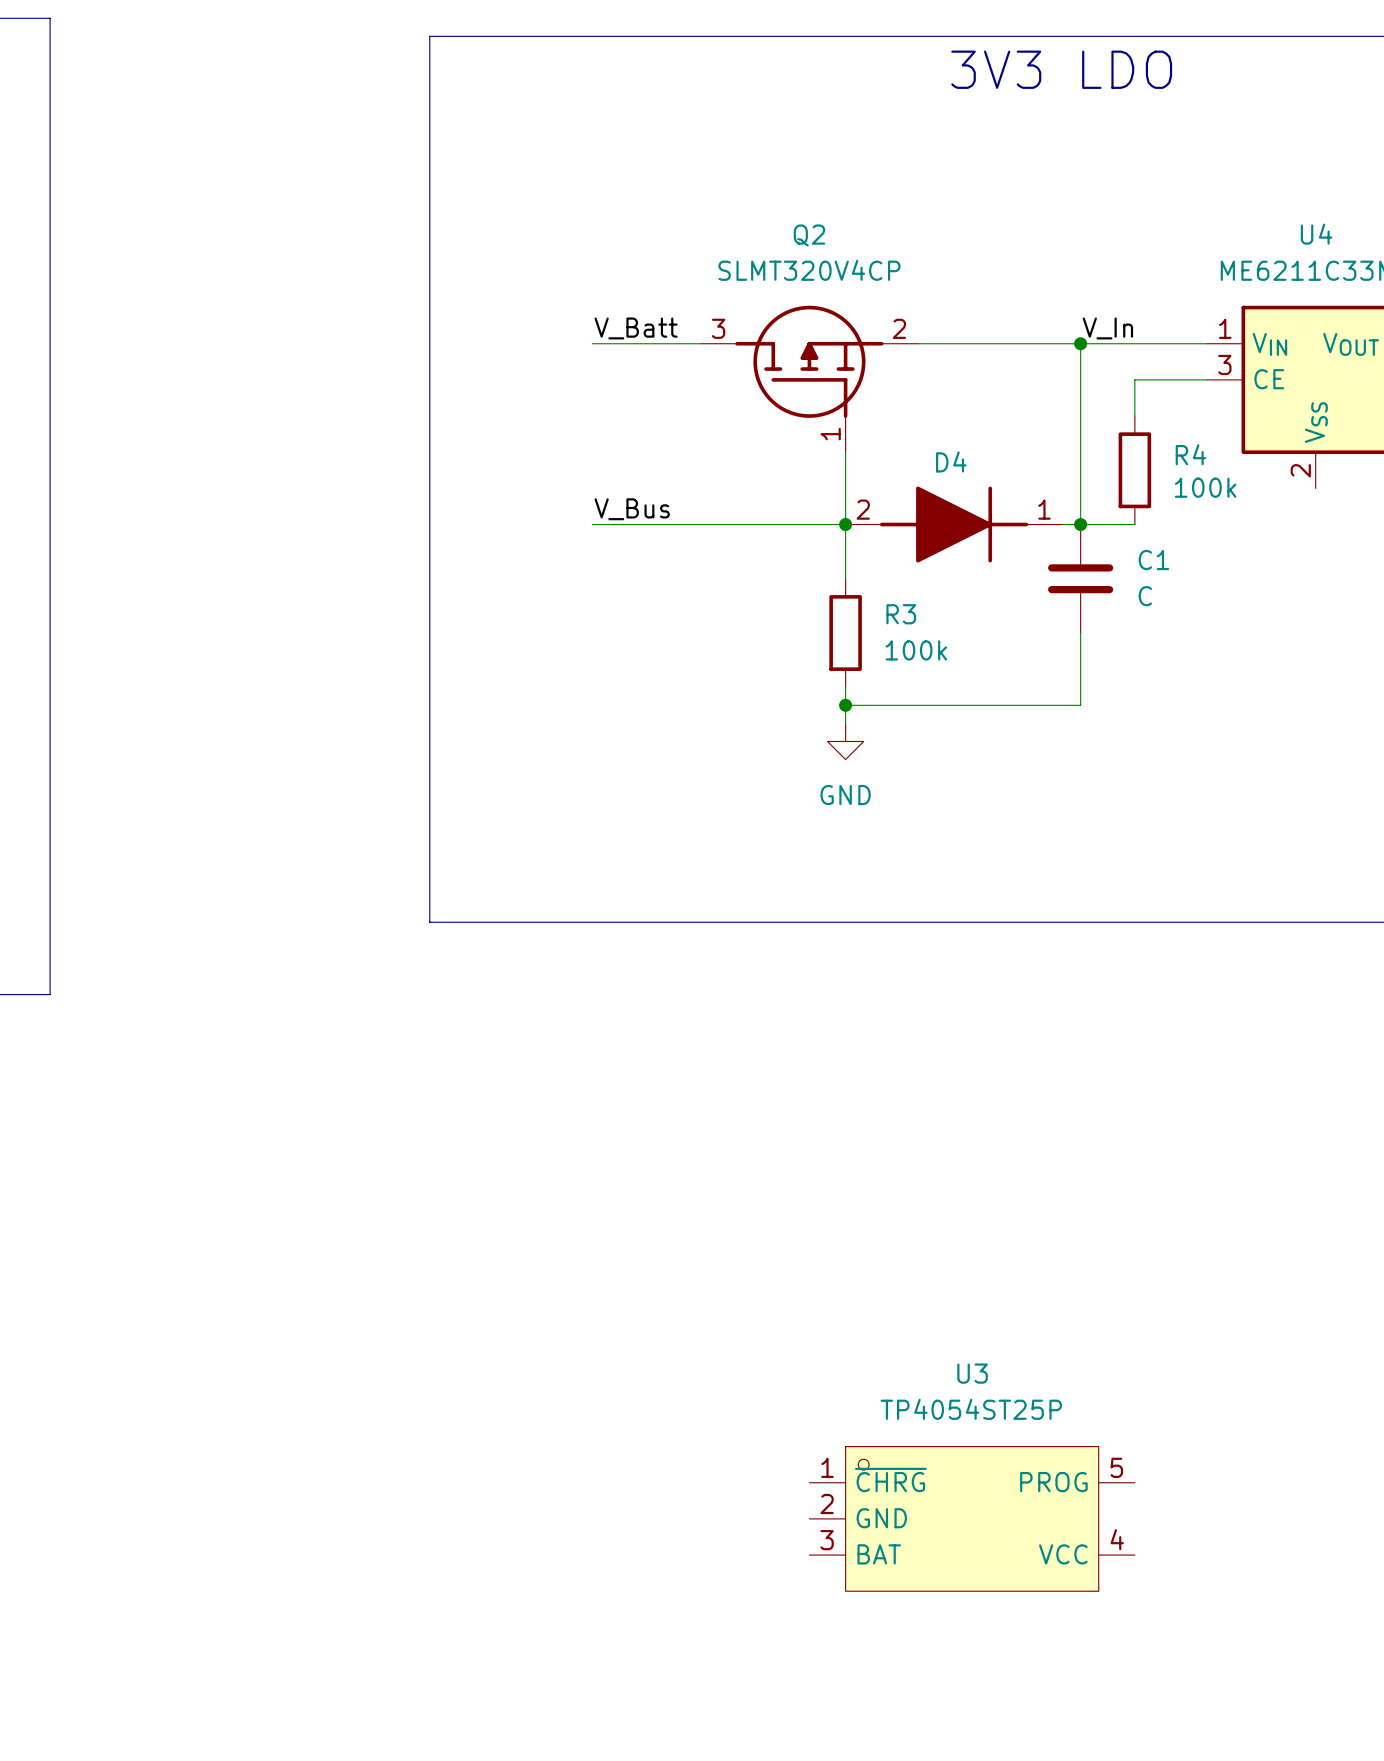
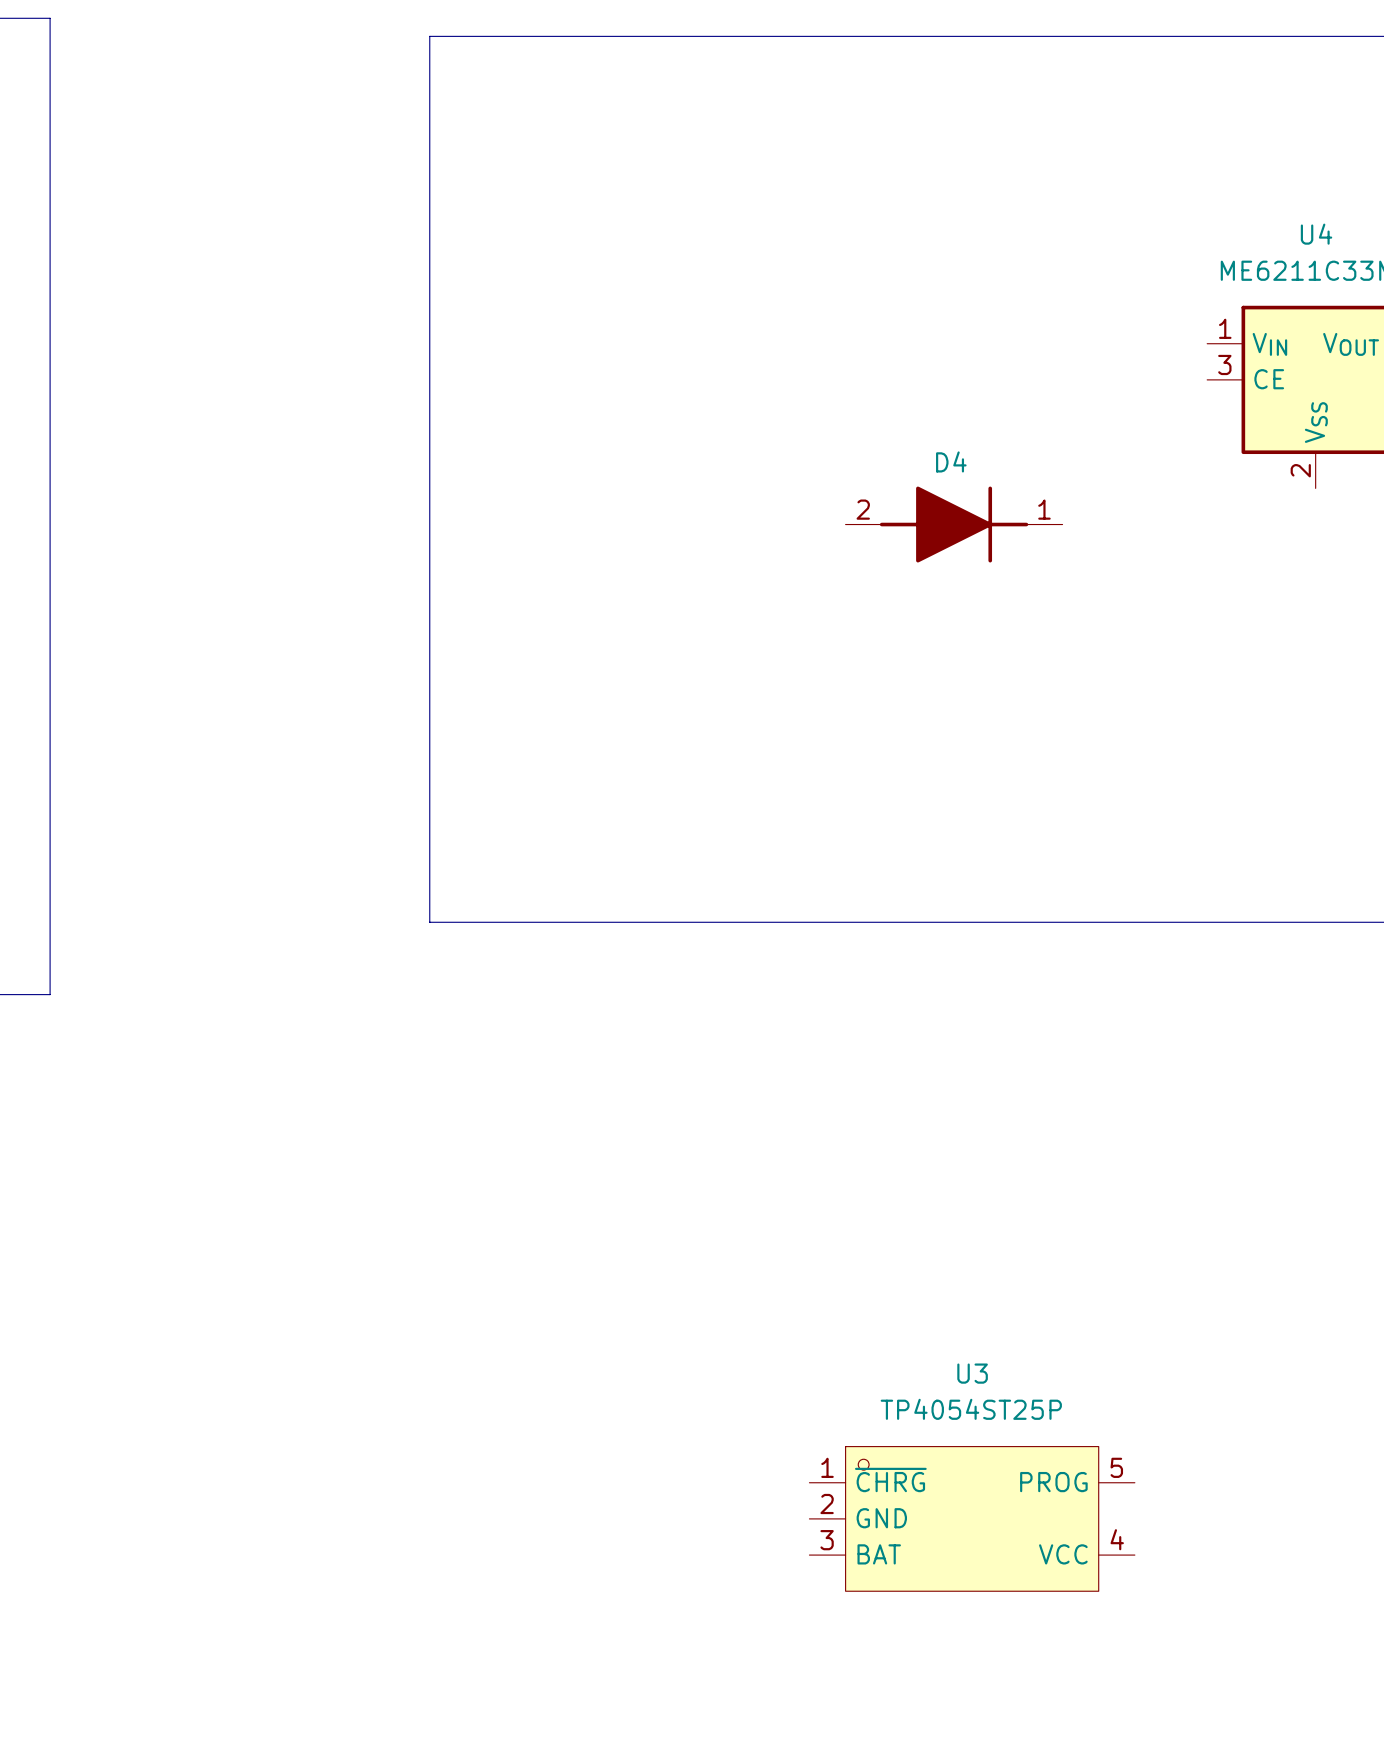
text: 3V3 LDO (1061, 69) -> none
label: V_Batt (636, 328) -> none
label: V_In (1107, 328) -> none
wire: (592, 343) (700, 343) -> none
wire: (917, 343) (1207, 343) -> none
wire: (1080, 343) (1080, 524) -> none
junction: (1080, 343) -> none
Q2: SLMT320V4CP (809, 378) -> none
wire: (1207, 379) (1134, 379) (1134, 416) -> none
wire: (845, 452) (845, 578) -> none
R4: 100k (1134, 470) -> none
label: V_Bus (632, 509) -> none
wire: (592, 524) (845, 524) -> none
junction: (845, 524) -> none
wire: (1062, 524) (1134, 524) -> none
junction: (1080, 524) -> none
C1: C (1080, 578) -> none
R3: 100k (845, 633) -> none
wire: (1080, 633) (1080, 705) (845, 705) -> none
wire: (845, 687) (845, 723) -> none
junction: (845, 705) -> none
power symbol: GND (845, 741) -> none

